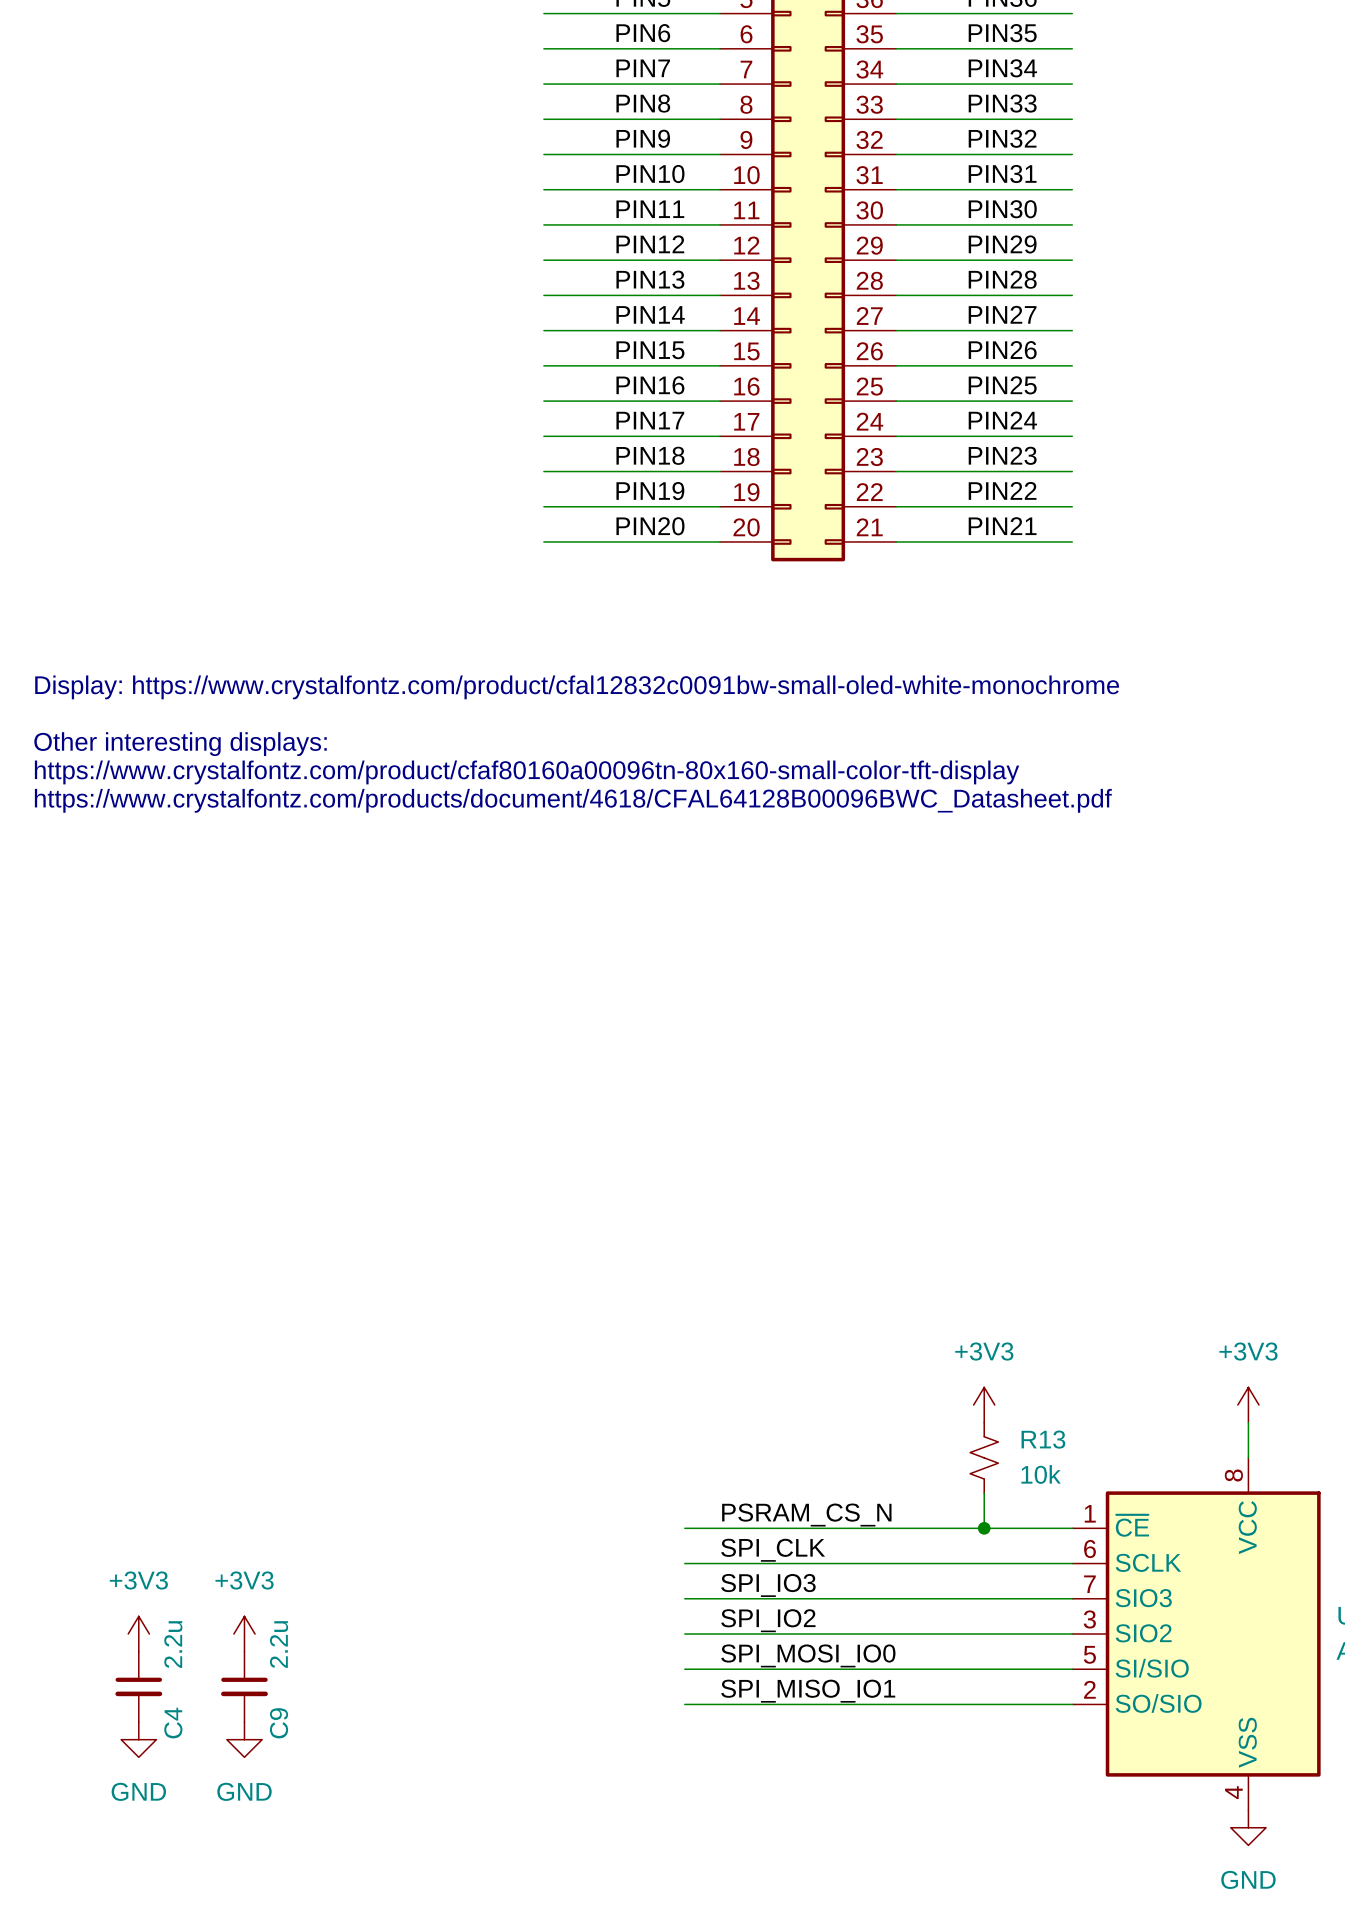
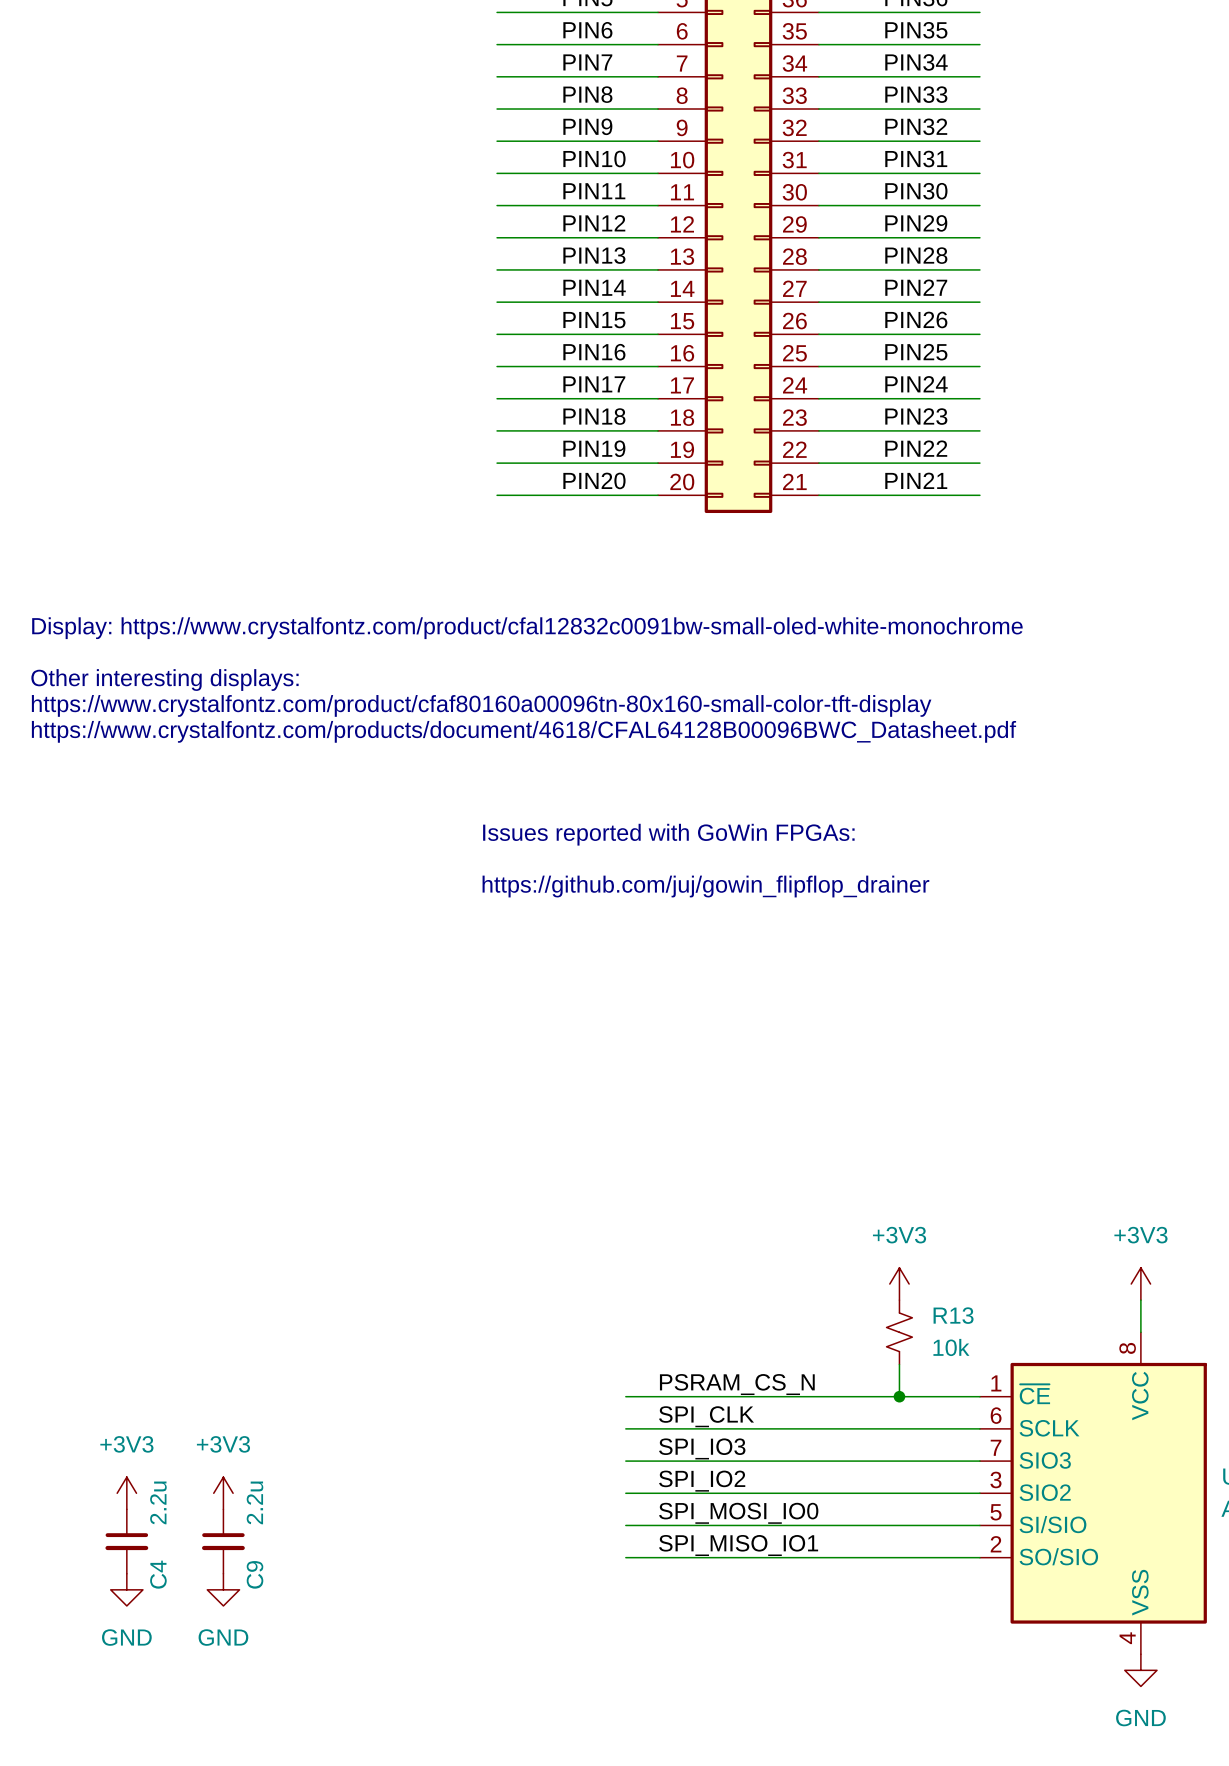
text: none -> Issues reported with GoWin FPGAs: (668, 834)
text: none -> https://github.com/juj/gowin_flipflop_drainer (705, 886)

